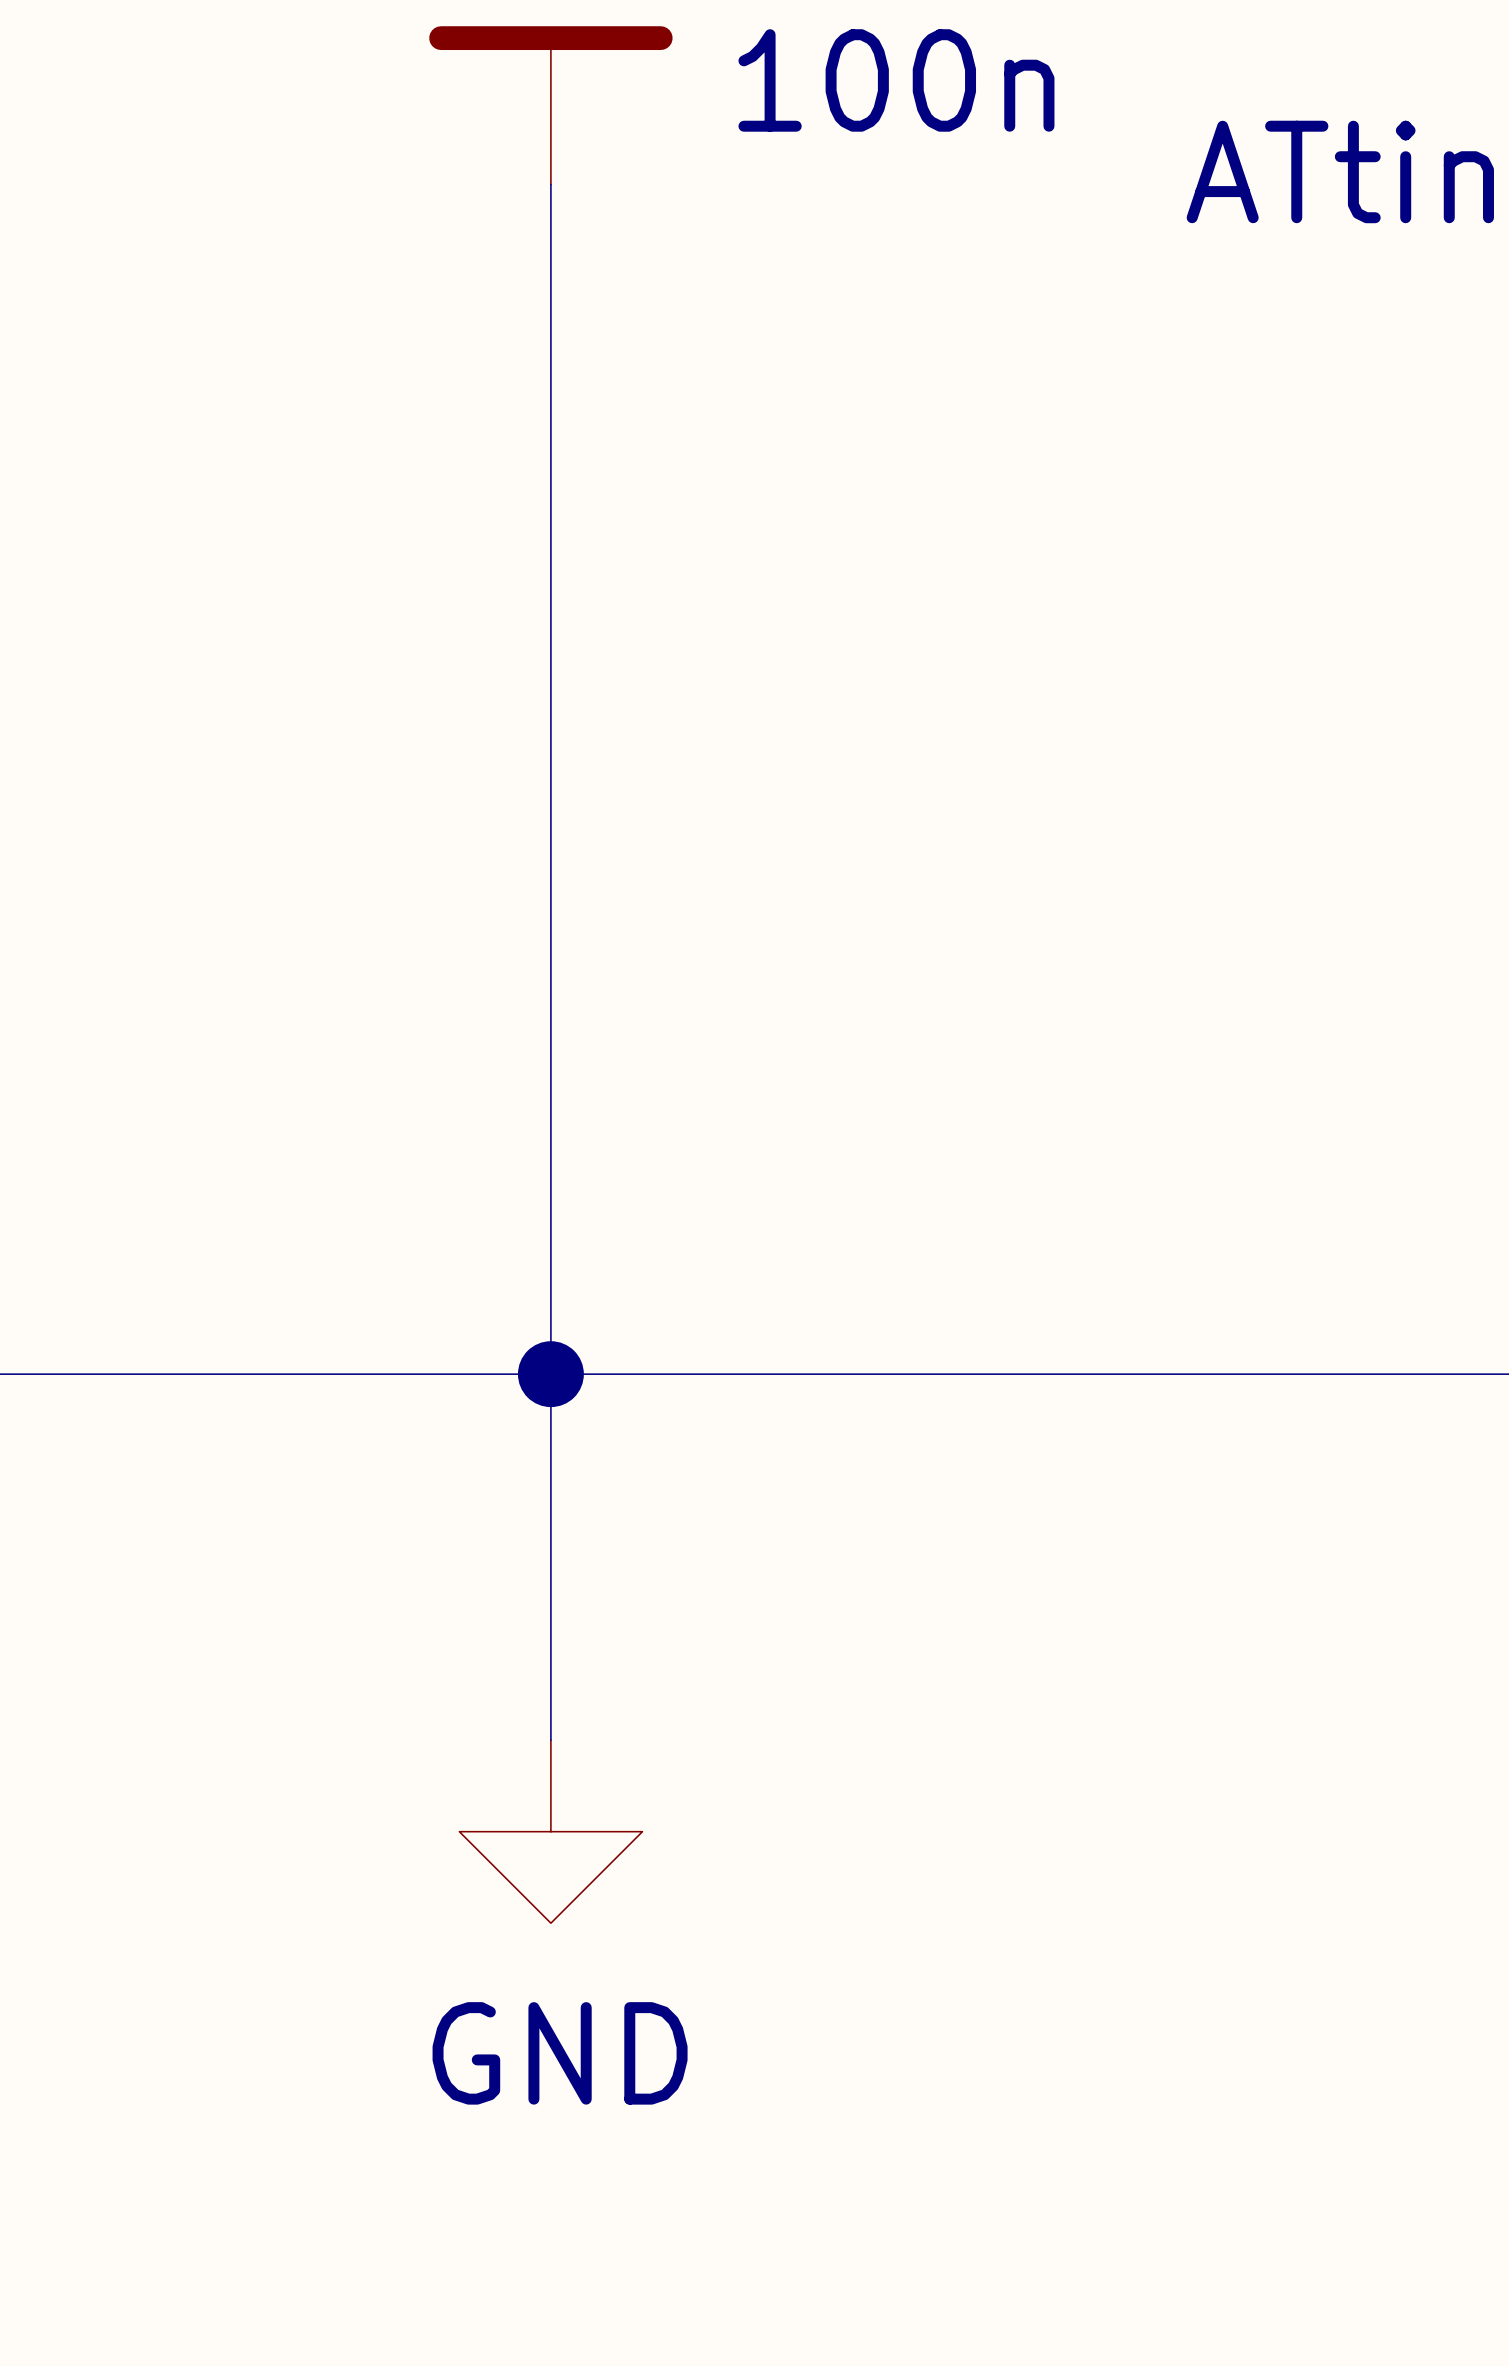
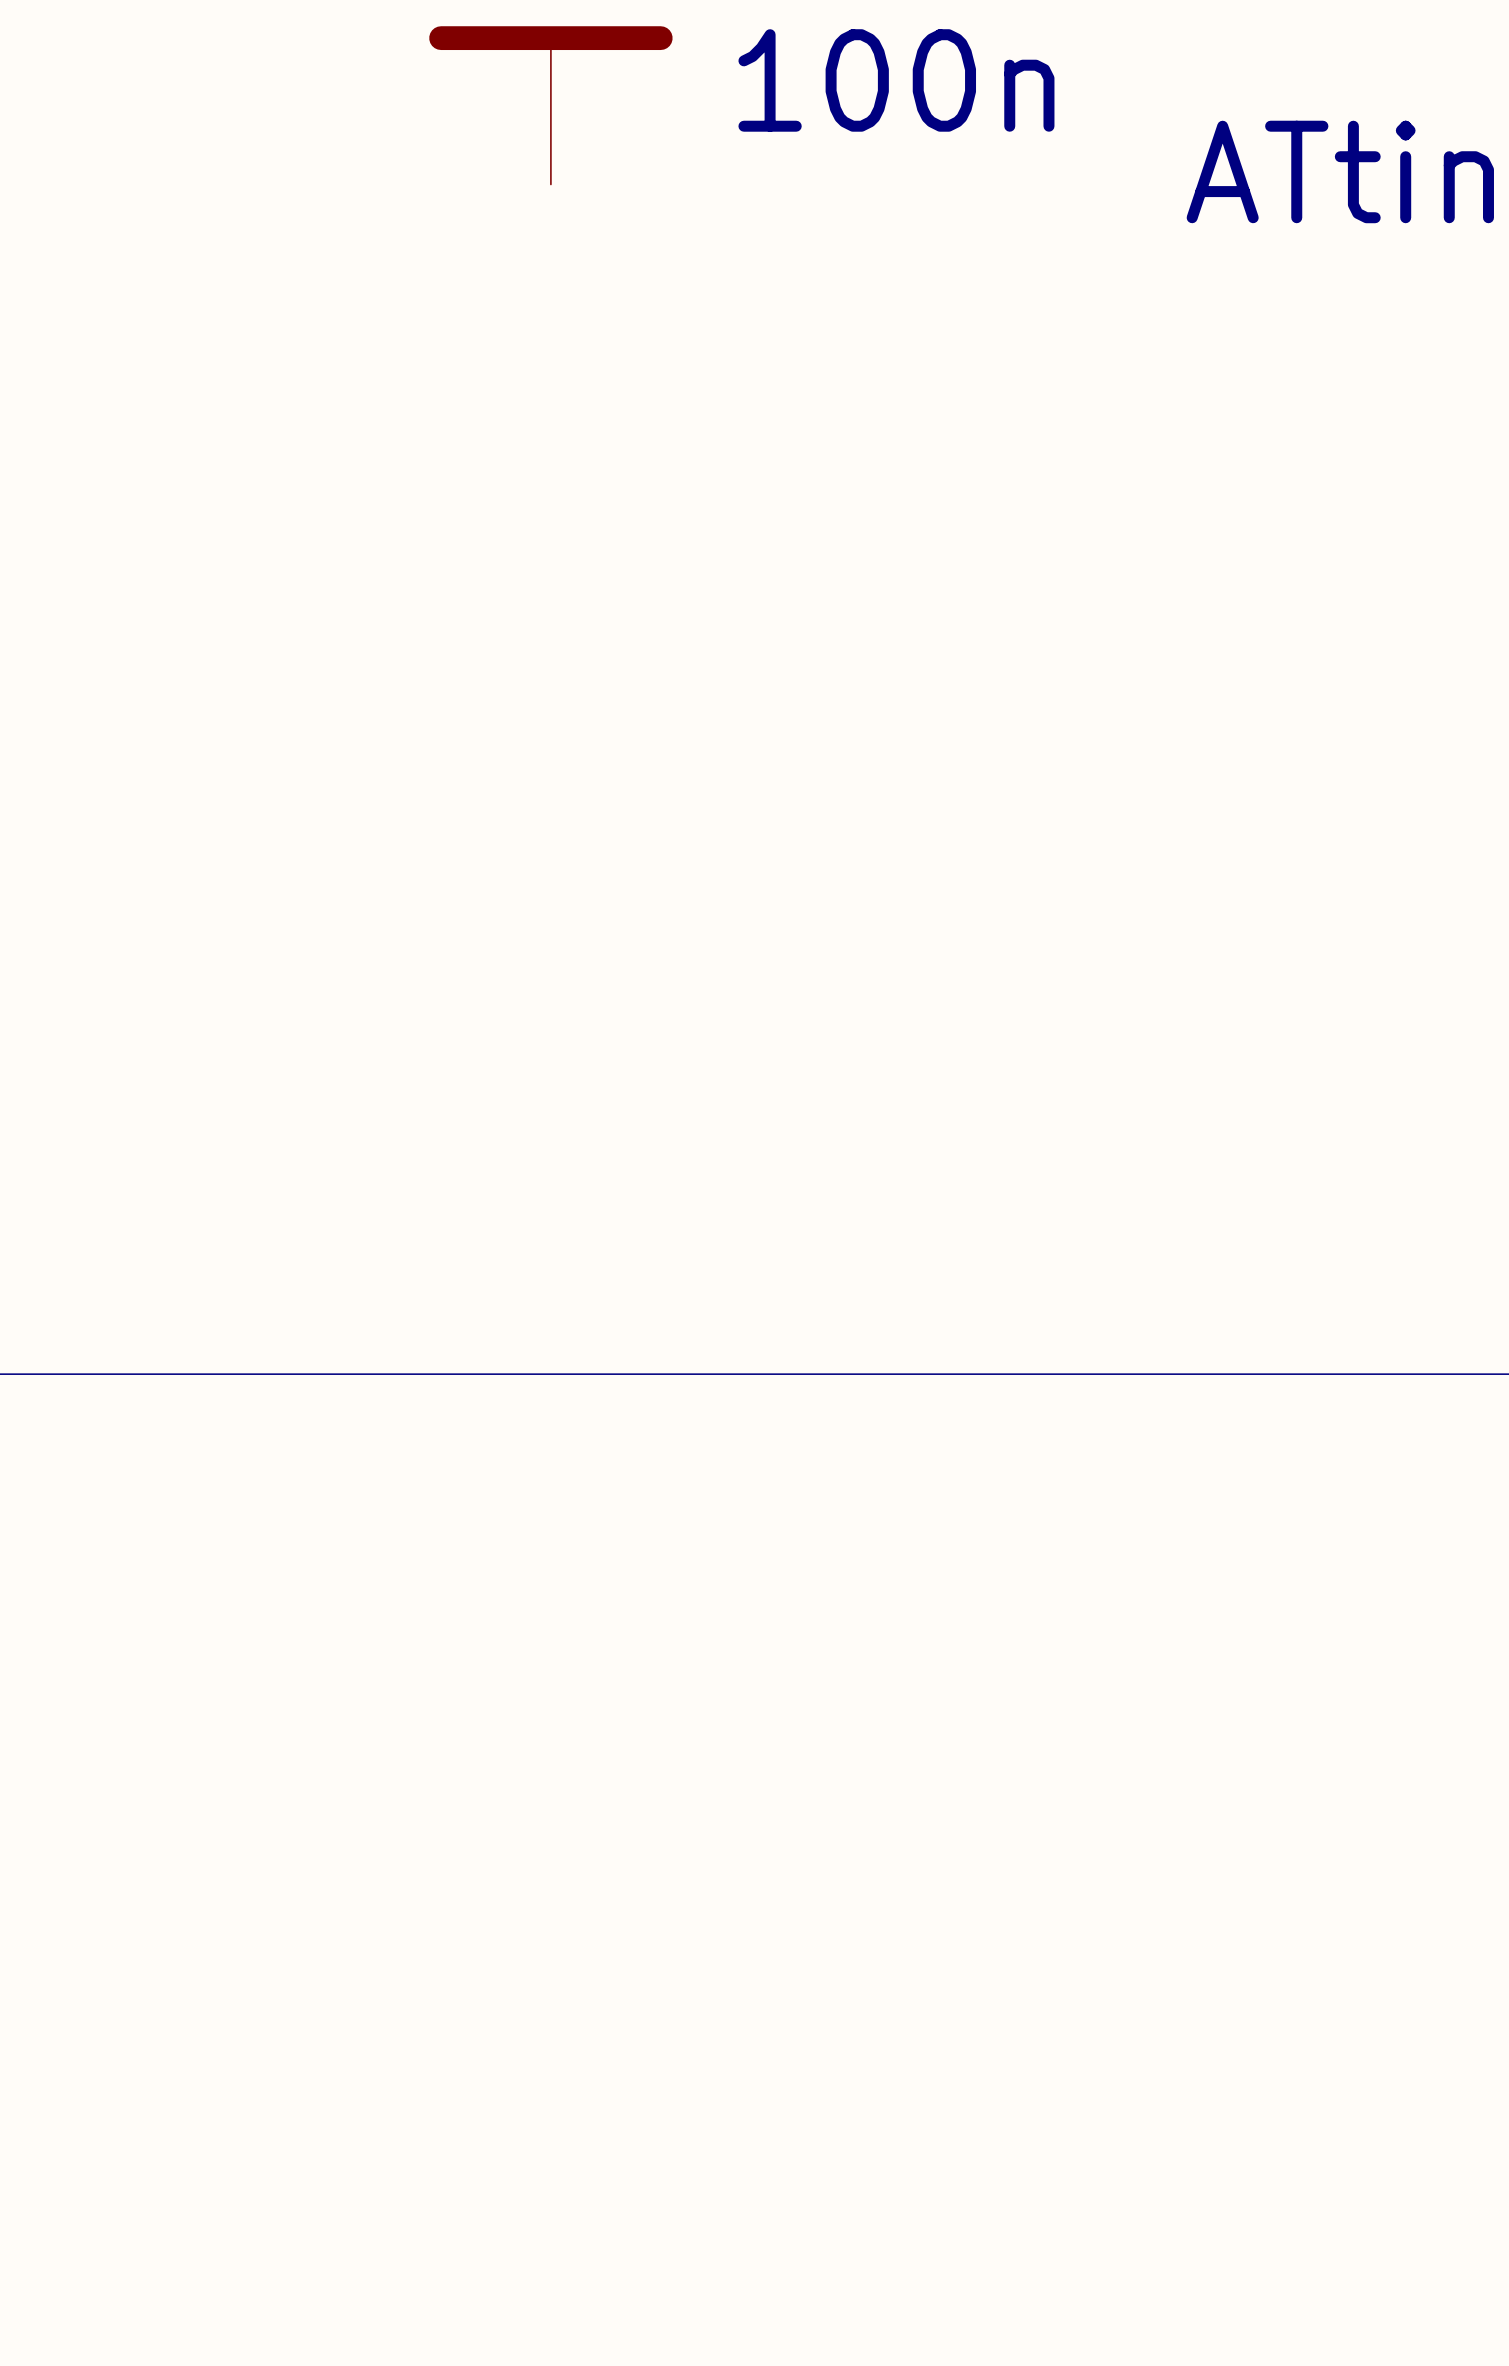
wire: (550, 184) (550, 1740) -> none
junction: (550, 1374) -> none
power symbol: GND (550, 1831) -> none

